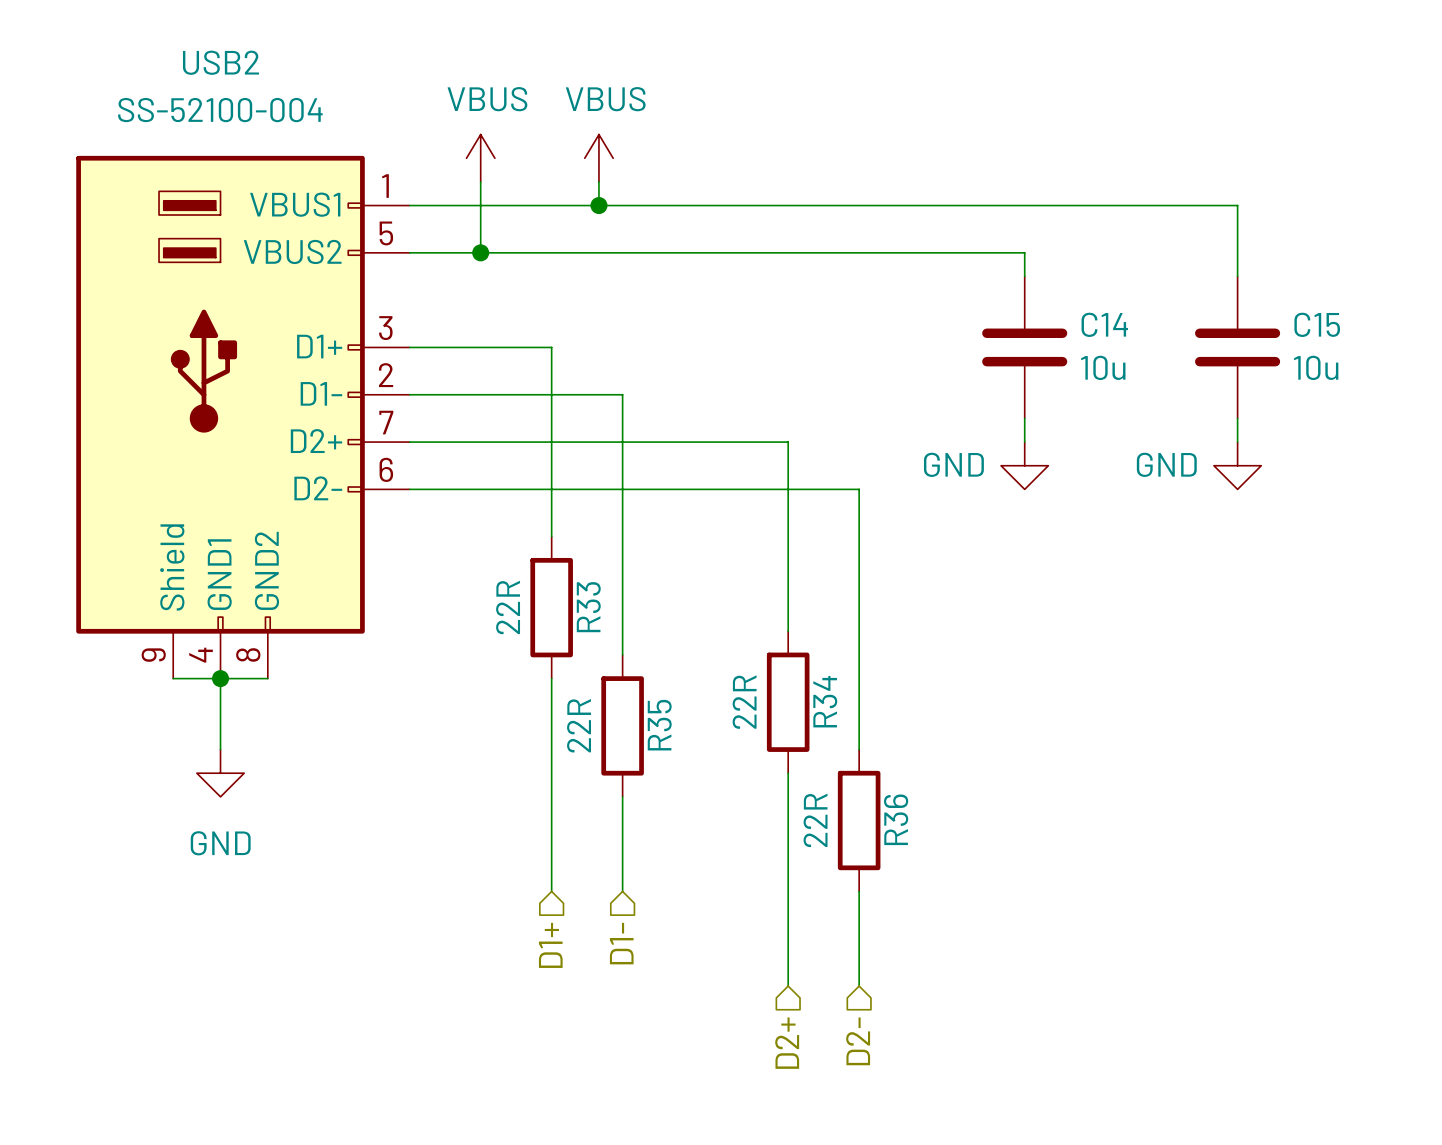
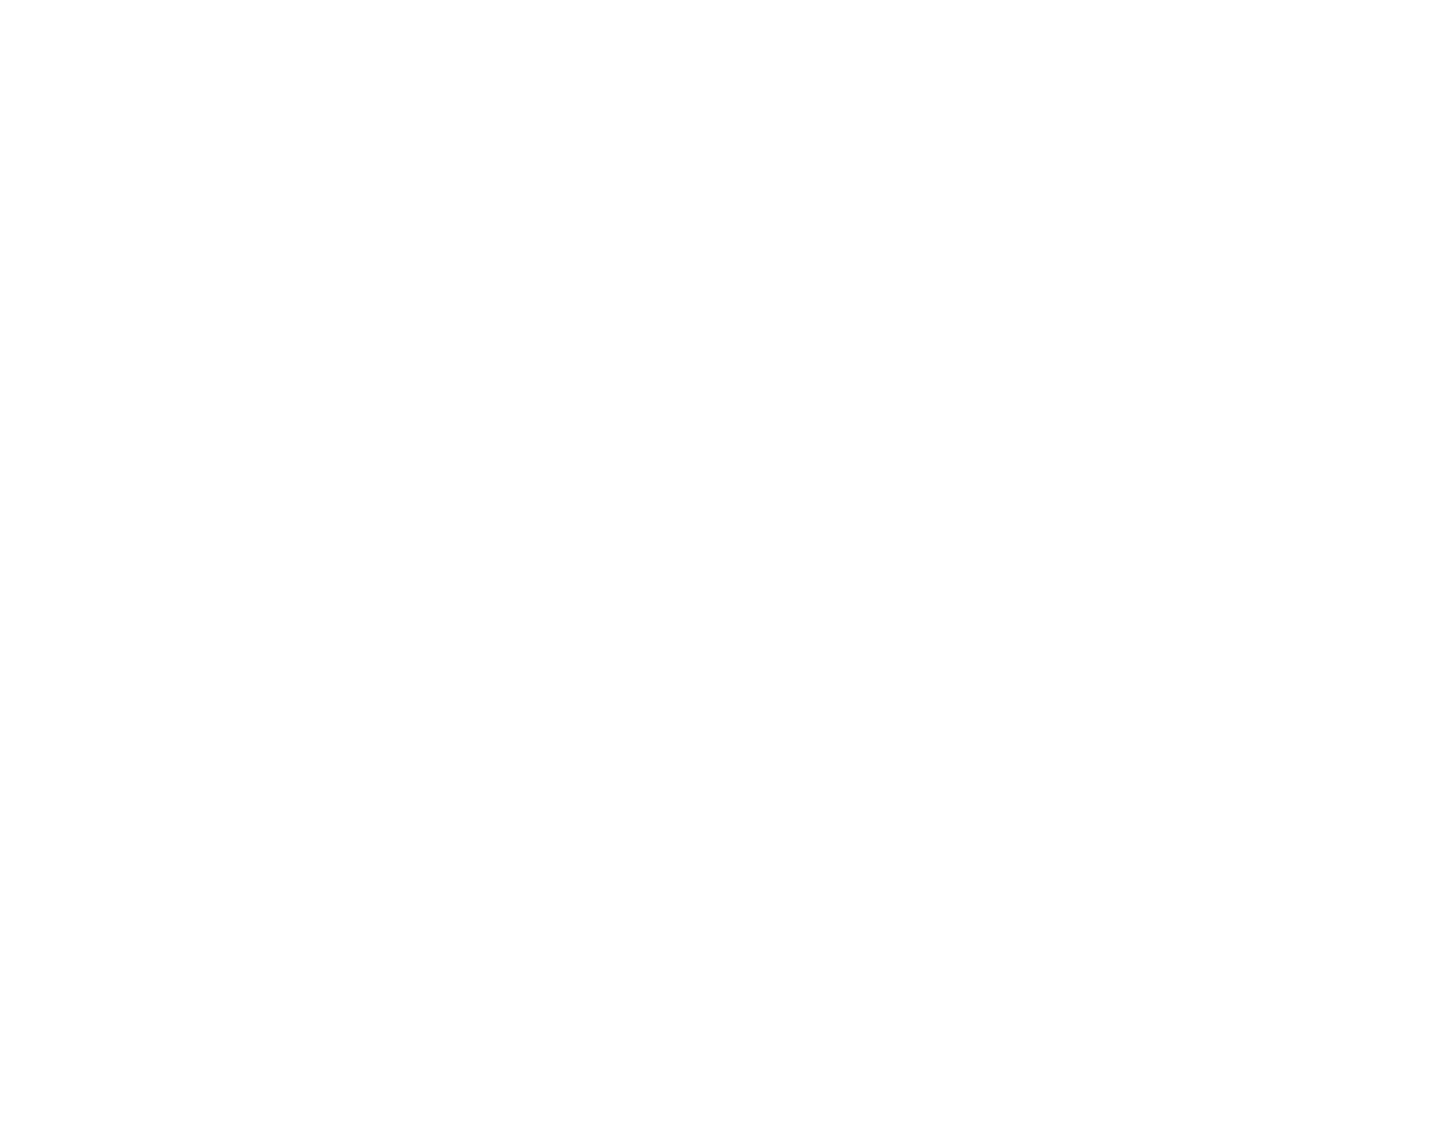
power symbol: VBUS (480, 158) -> none
power symbol: VBUS (598, 158) -> none
wire: (480, 181) (480, 252) -> none
wire: (598, 181) (598, 205) -> none
wire: (409, 205) (1237, 205) (1237, 276) -> none
junction: (598, 205) -> none
wire: (409, 252) (1024, 252) (1024, 276) -> none
junction: (480, 252) -> none
wire: (409, 347) (551, 347) (551, 536) -> none
C14: 10u (1024, 347) -> none
C15: 10u (1237, 347) -> none
wire: (409, 394) (622, 394) (622, 654) -> none
USB2: SS-52100-004 (242, 417) -> none
wire: (1024, 418) (1024, 442) -> none
wire: (1237, 418) (1237, 442) -> none
wire: (409, 442) (788, 442) (788, 631) -> none
power symbol: GND (1024, 465) -> none
power symbol: GND (1237, 465) -> none
wire: (409, 489) (859, 489) (859, 749) -> none
R33: 22R (551, 607) -> none
wire: (173, 678) (267, 678) -> none
wire: (220, 678) (220, 749) -> none
junction: (220, 678) -> none
wire: (551, 678) (551, 891) -> none
R34: 22R (788, 702) -> none
R35: 22R (622, 725) -> none
power symbol: GND (220, 773) -> none
wire: (788, 773) (788, 986) -> none
wire: (622, 796) (622, 891) -> none
R36: 22R (859, 820) -> none
wire: (859, 891) (859, 986) -> none
hierarchical label: D1- (621, 943) -> none
hierarchical label: D1+ (550, 945) -> none
hierarchical label: D2- (858, 1041) -> none
hierarchical label: D2+ (787, 1043) -> none

